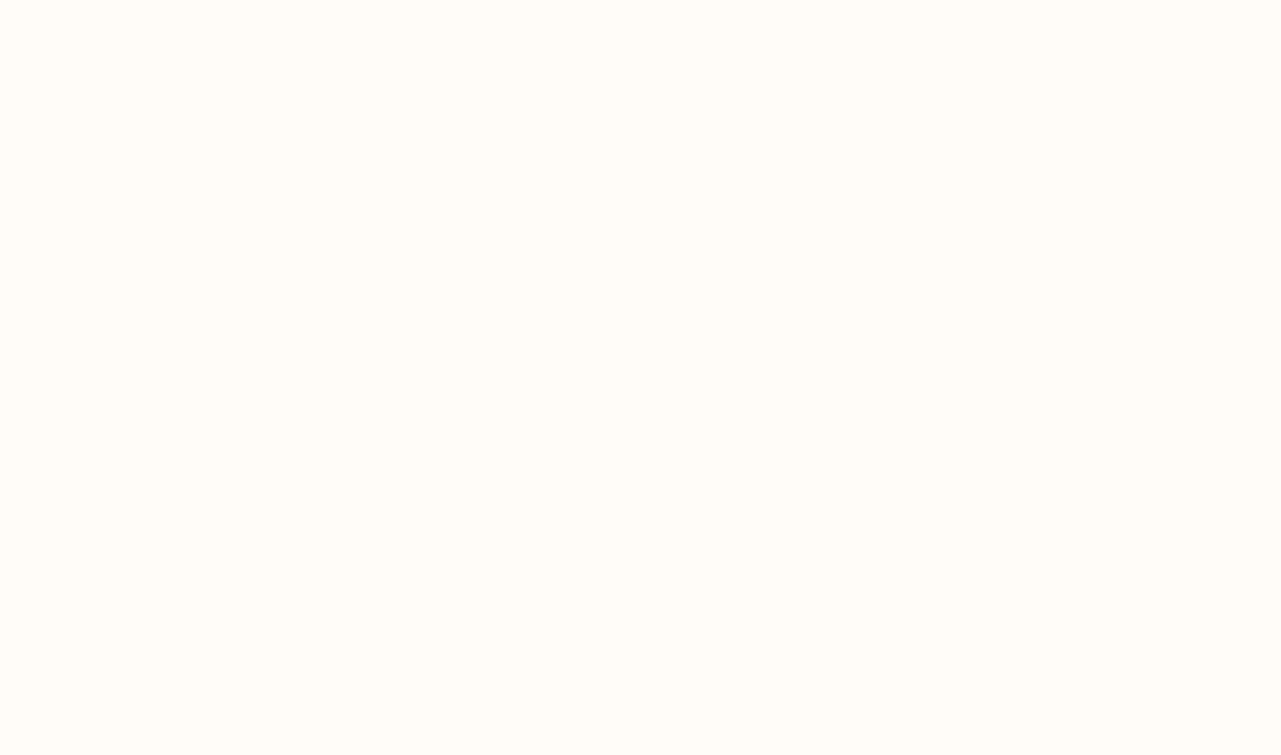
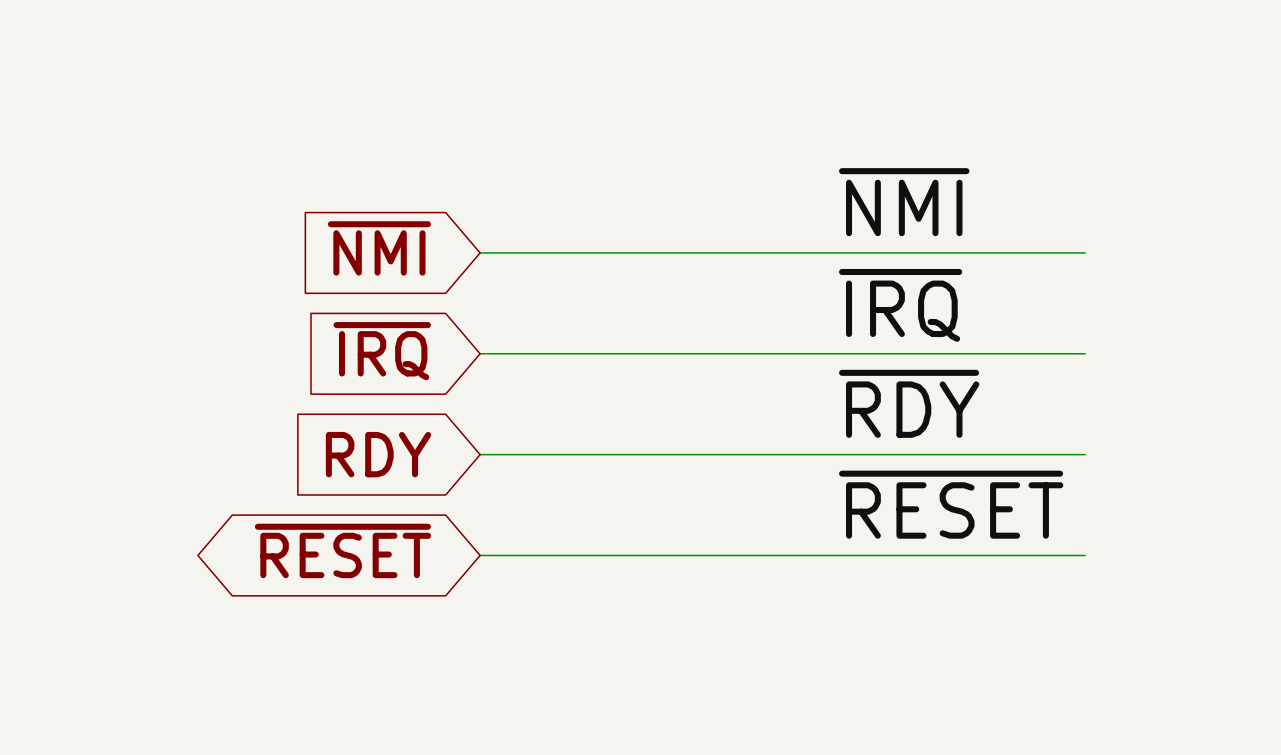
label: none -> ~{NMI} (904, 202)
global label: none -> ~{NMI} (379, 248)
wire: none -> (480, 252) (1085, 252)
label: none -> ~{IRQ} (900, 305)
wire: none -> (480, 353) (1085, 353)
global label: none -> ~{IRQ} (382, 351)
label: none -> ~{RDY} (909, 403)
global label: none -> RDY (378, 454)
wire: none -> (480, 454) (1085, 454)
label: none -> ~{RESET} (951, 504)
global label: none -> ~{RESET} (343, 550)
wire: none -> (480, 555) (1085, 555)

